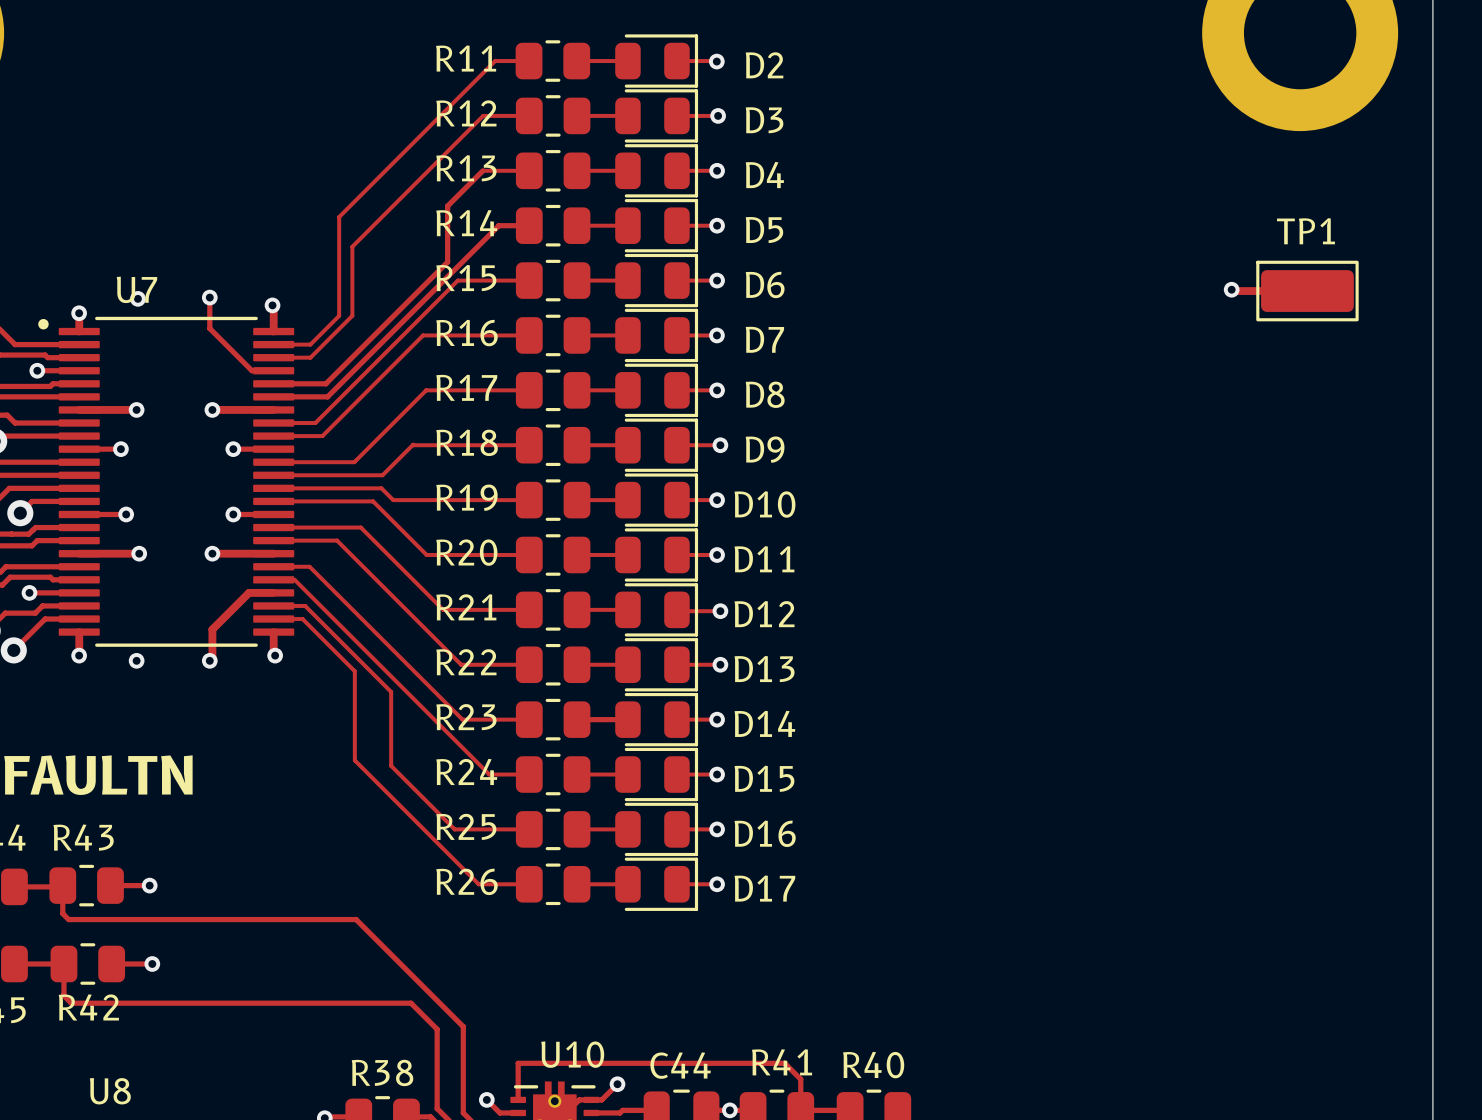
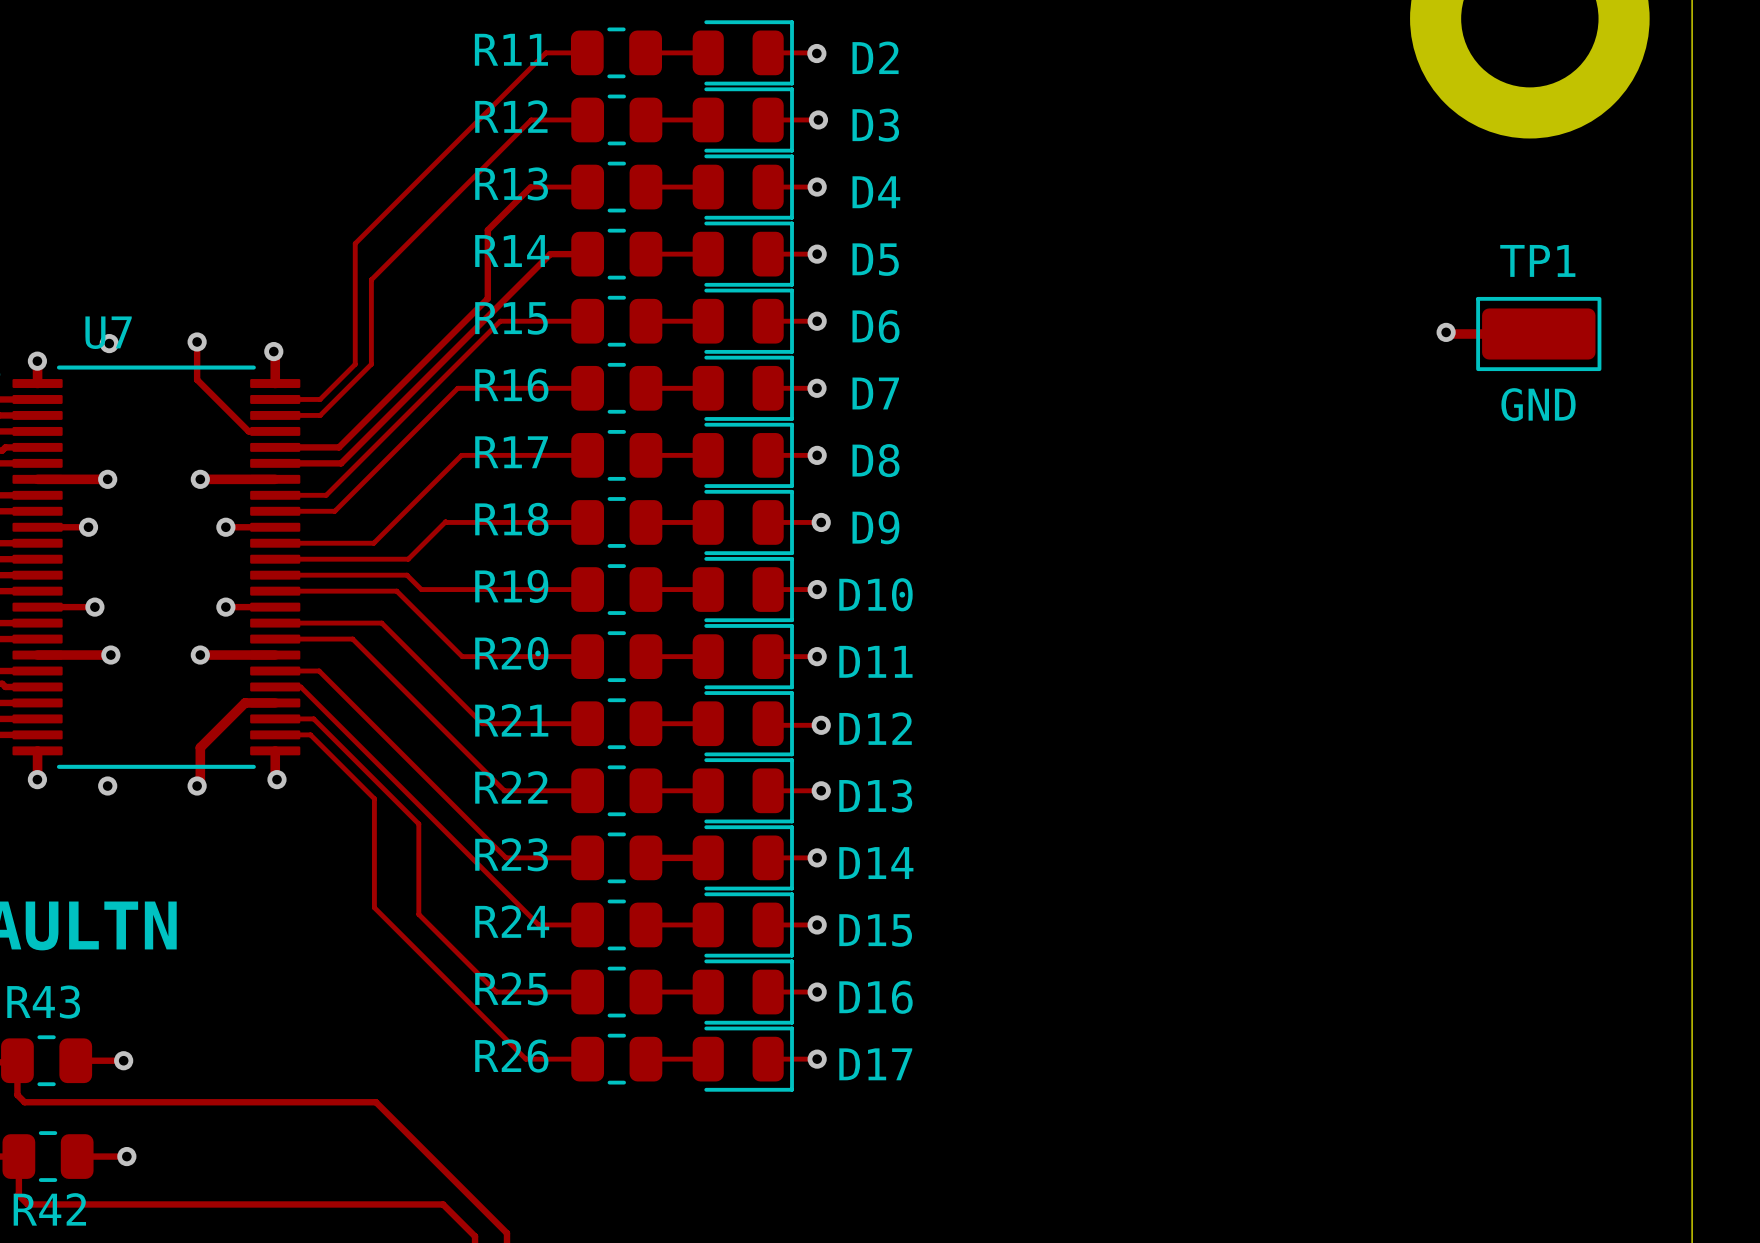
TP1 value: none -> GND (1538, 404)

